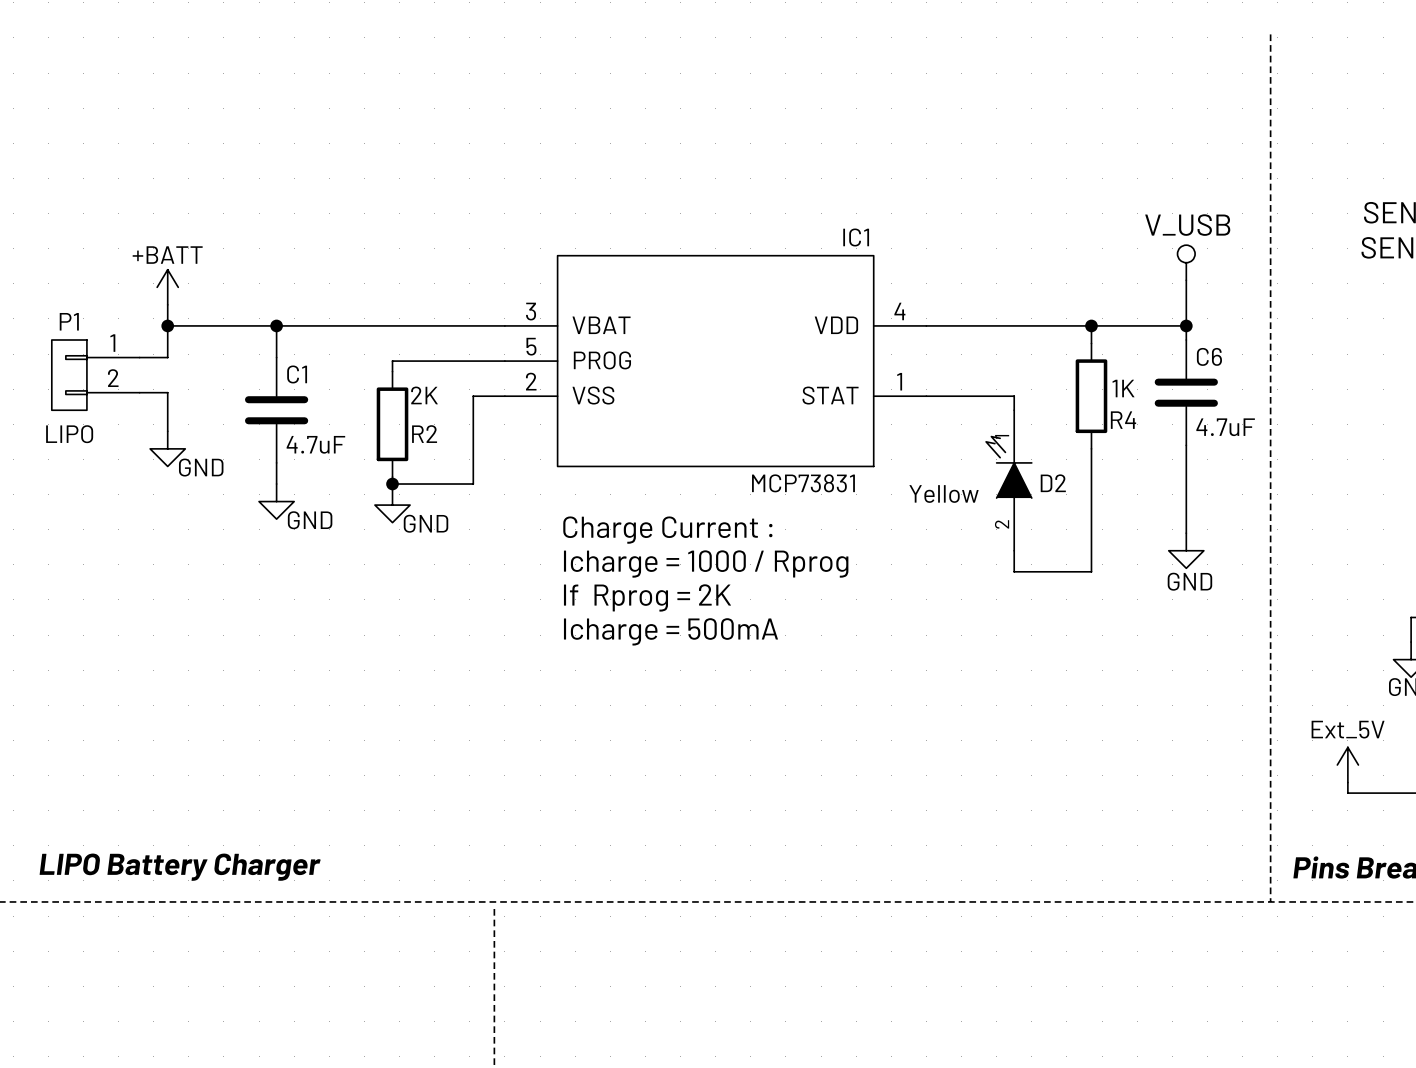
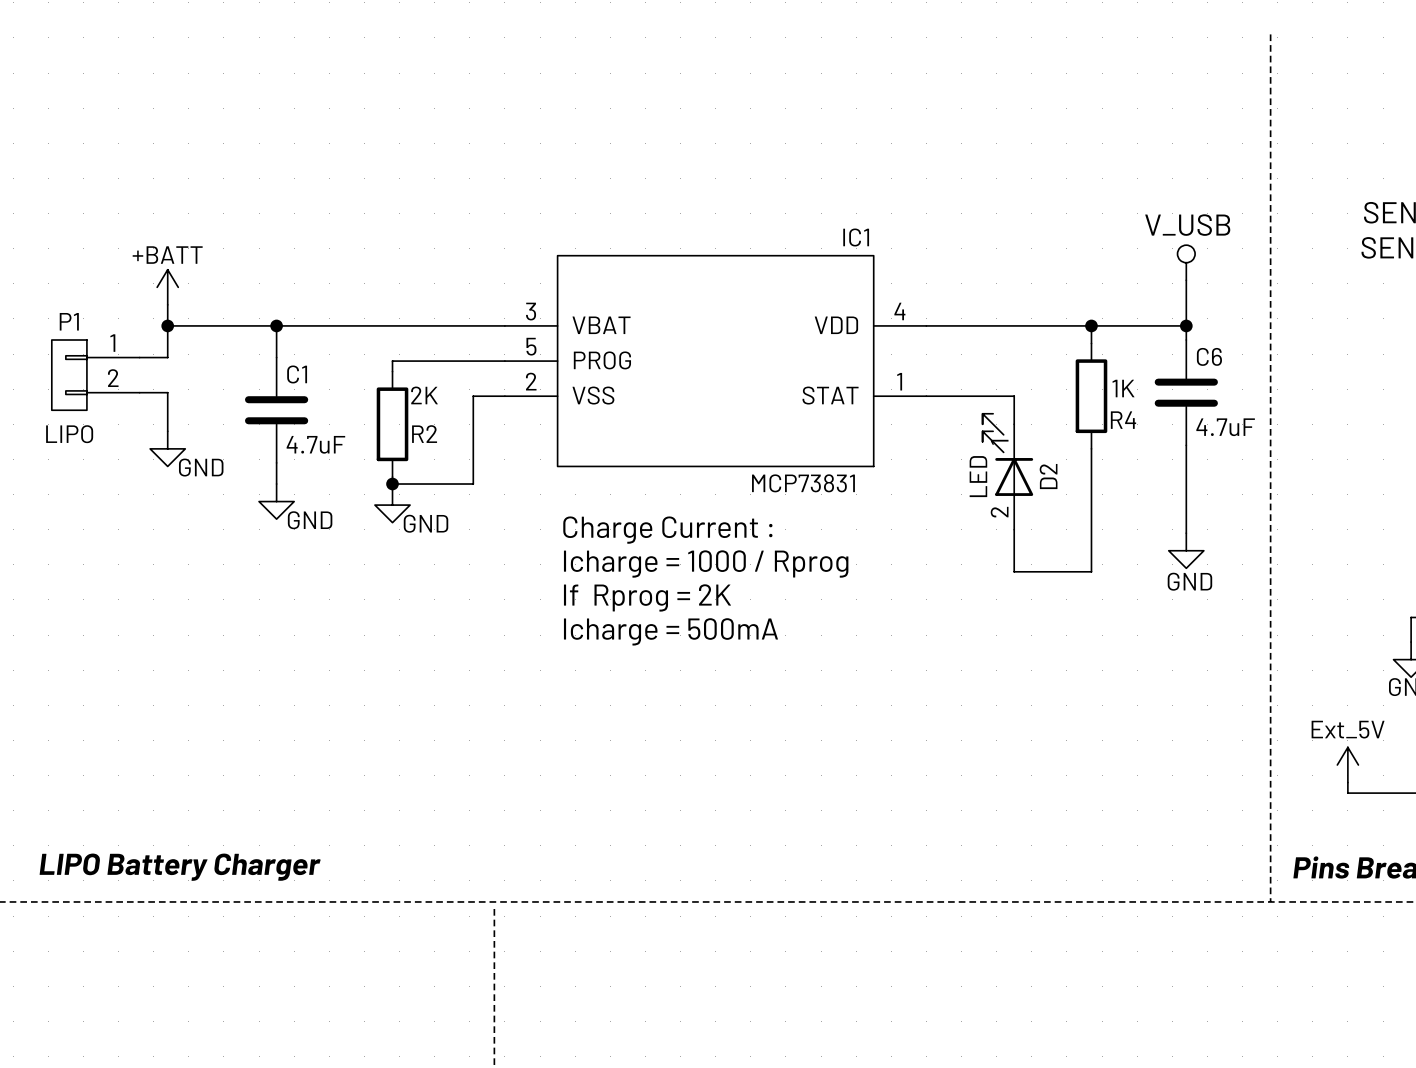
D2 symbol: [986, 410, 1032, 551] -> [982, 413, 1034, 530]
D2 value: Yellow (944, 494) -> LED (978, 476)

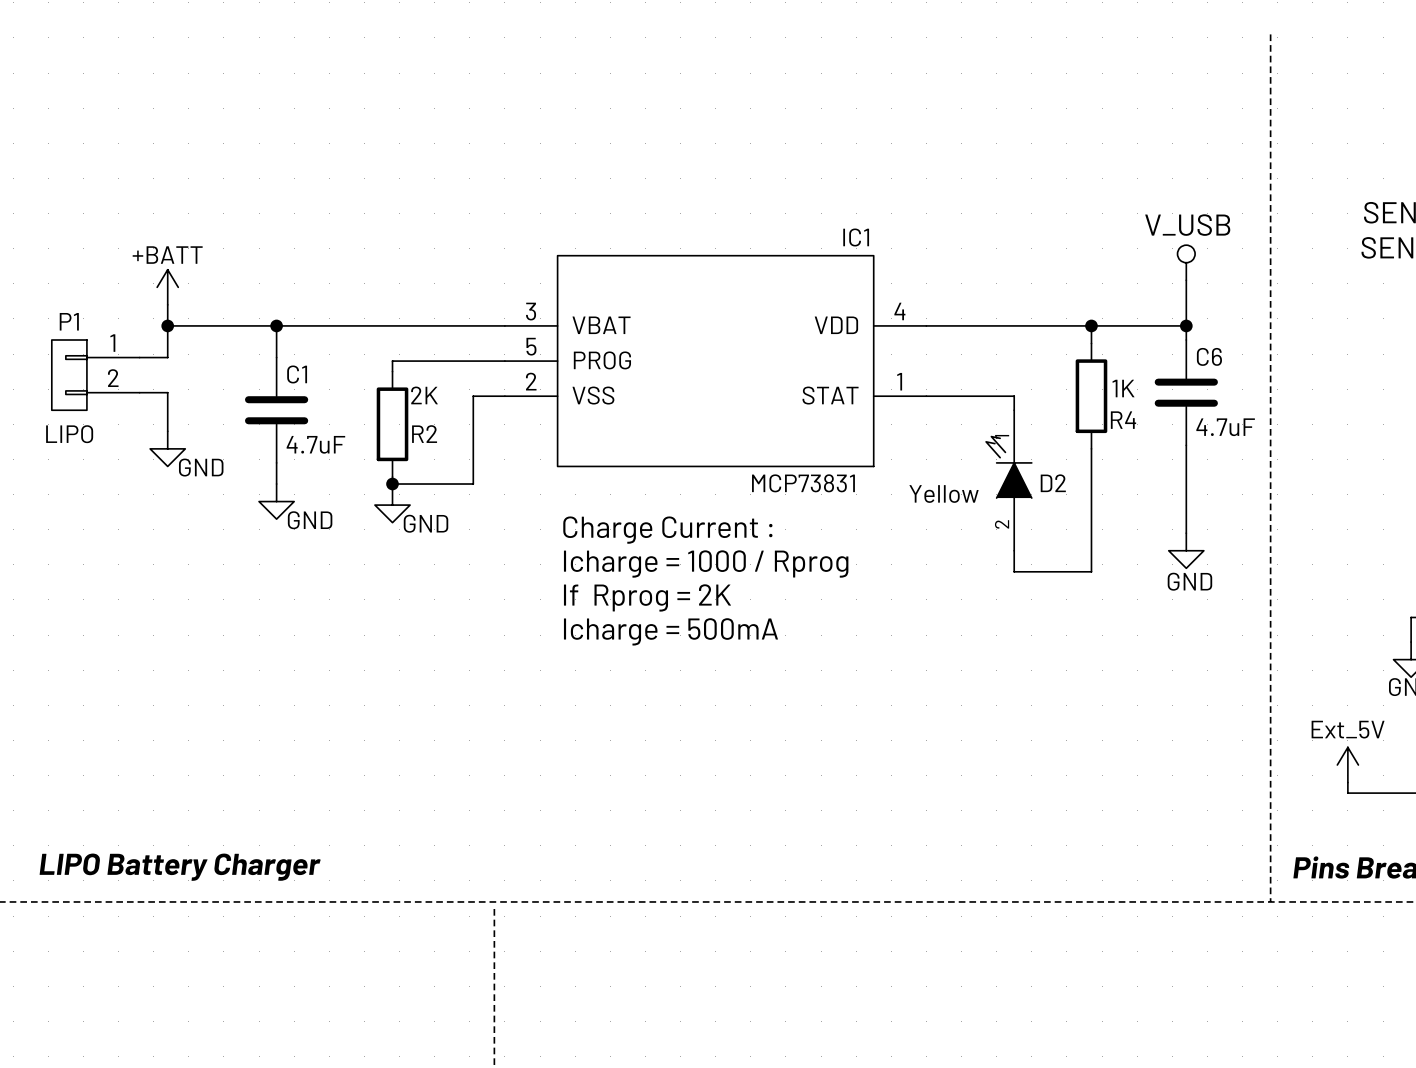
D2 symbol: [982, 413, 1034, 530] -> [986, 410, 1032, 551]
D2 value: LED (978, 476) -> Yellow (944, 494)

